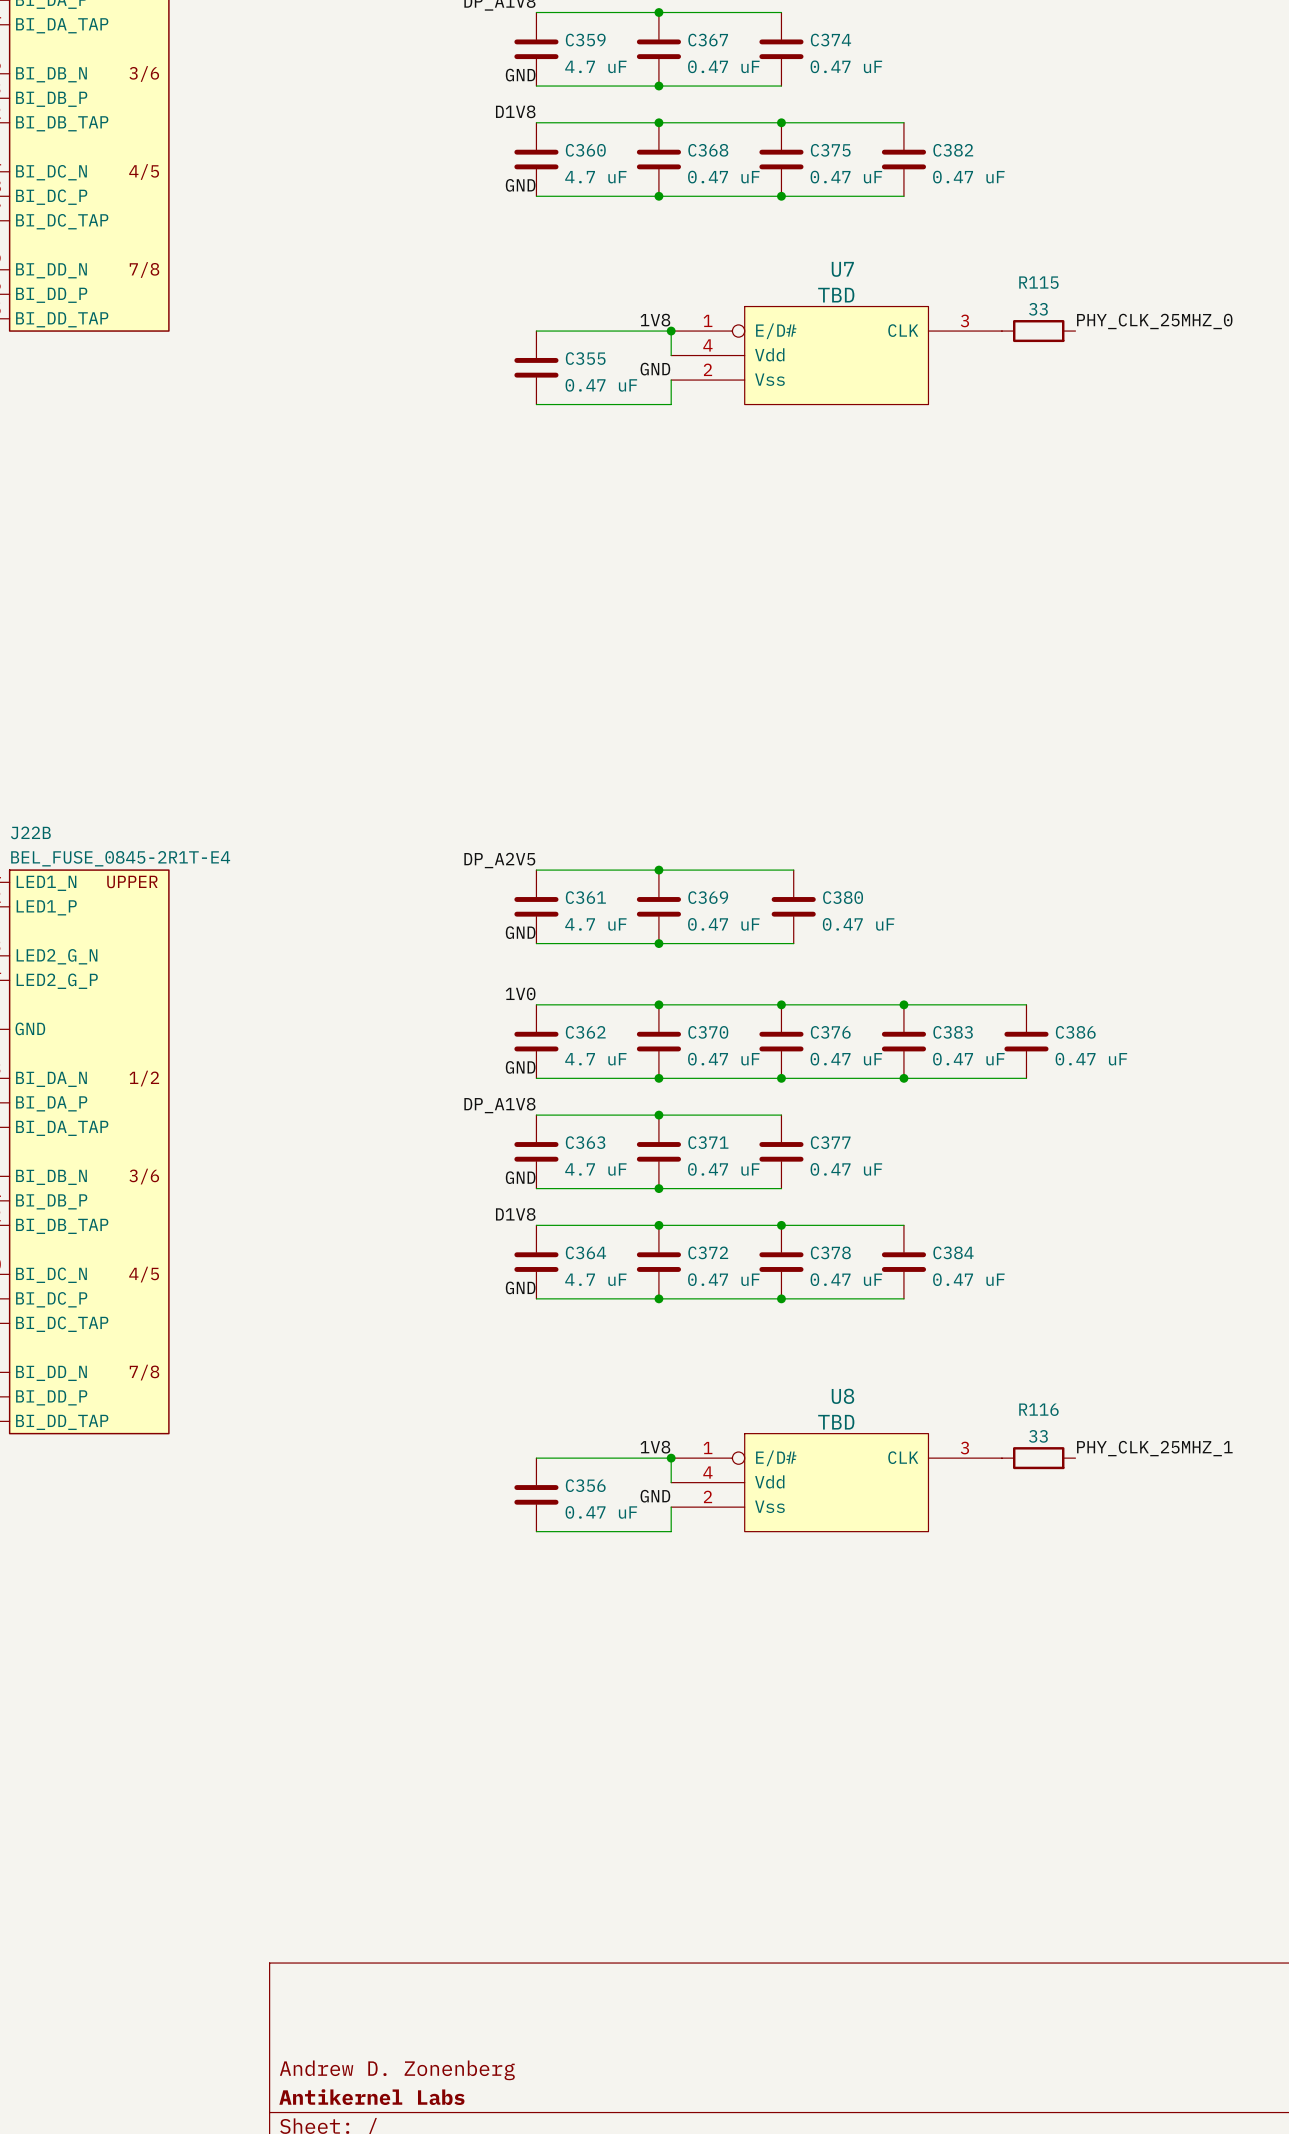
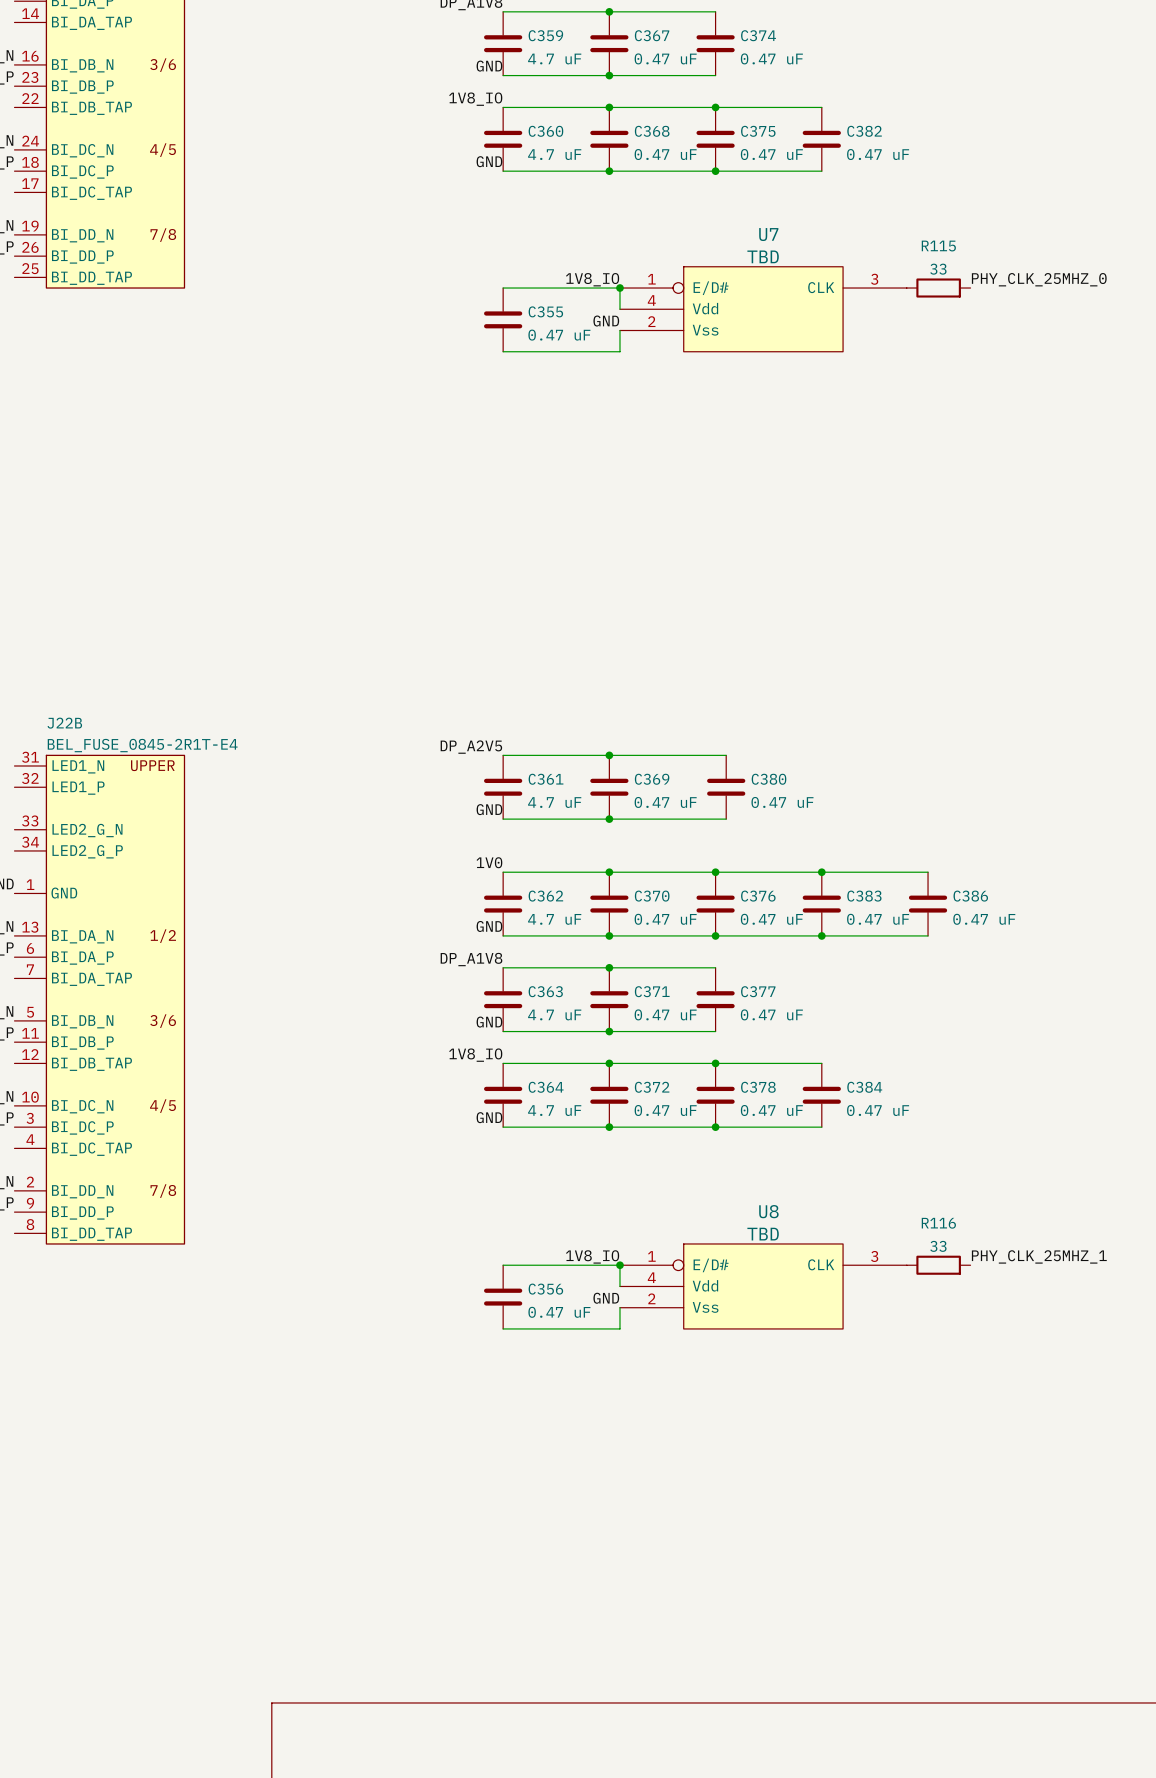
label: D1V8 (515, 111) -> 1V8_IO (475, 99)
label: 1V8 (655, 320) -> 1V8_IO (592, 279)
label: D1V8 (515, 1214) -> 1V8_IO (475, 1055)
label: 1V8 (655, 1447) -> 1V8_IO (592, 1256)

